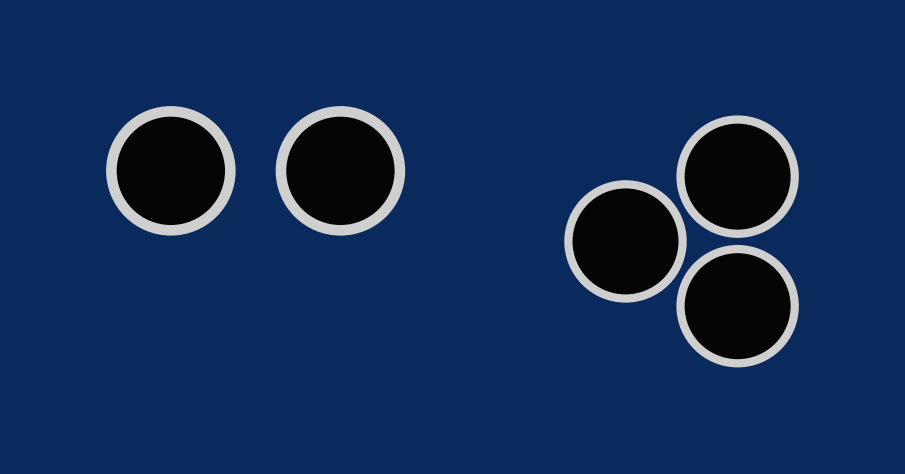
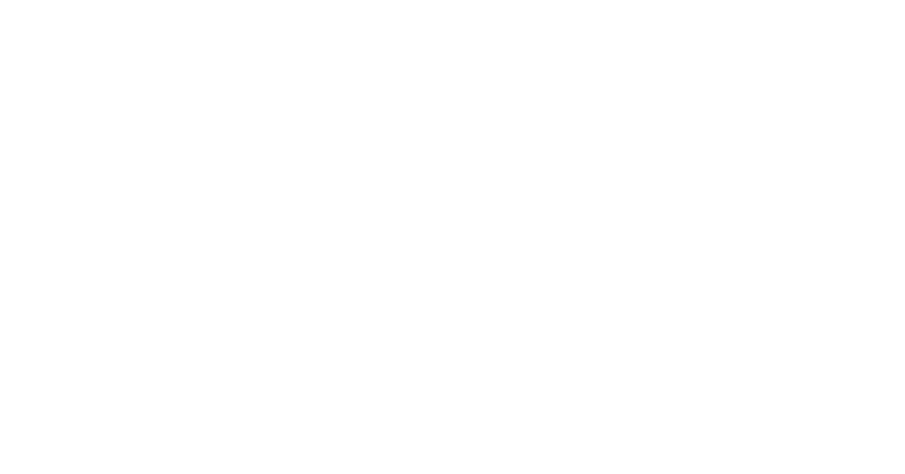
part: (255, 170) -> none
part: (681, 241) -> none

